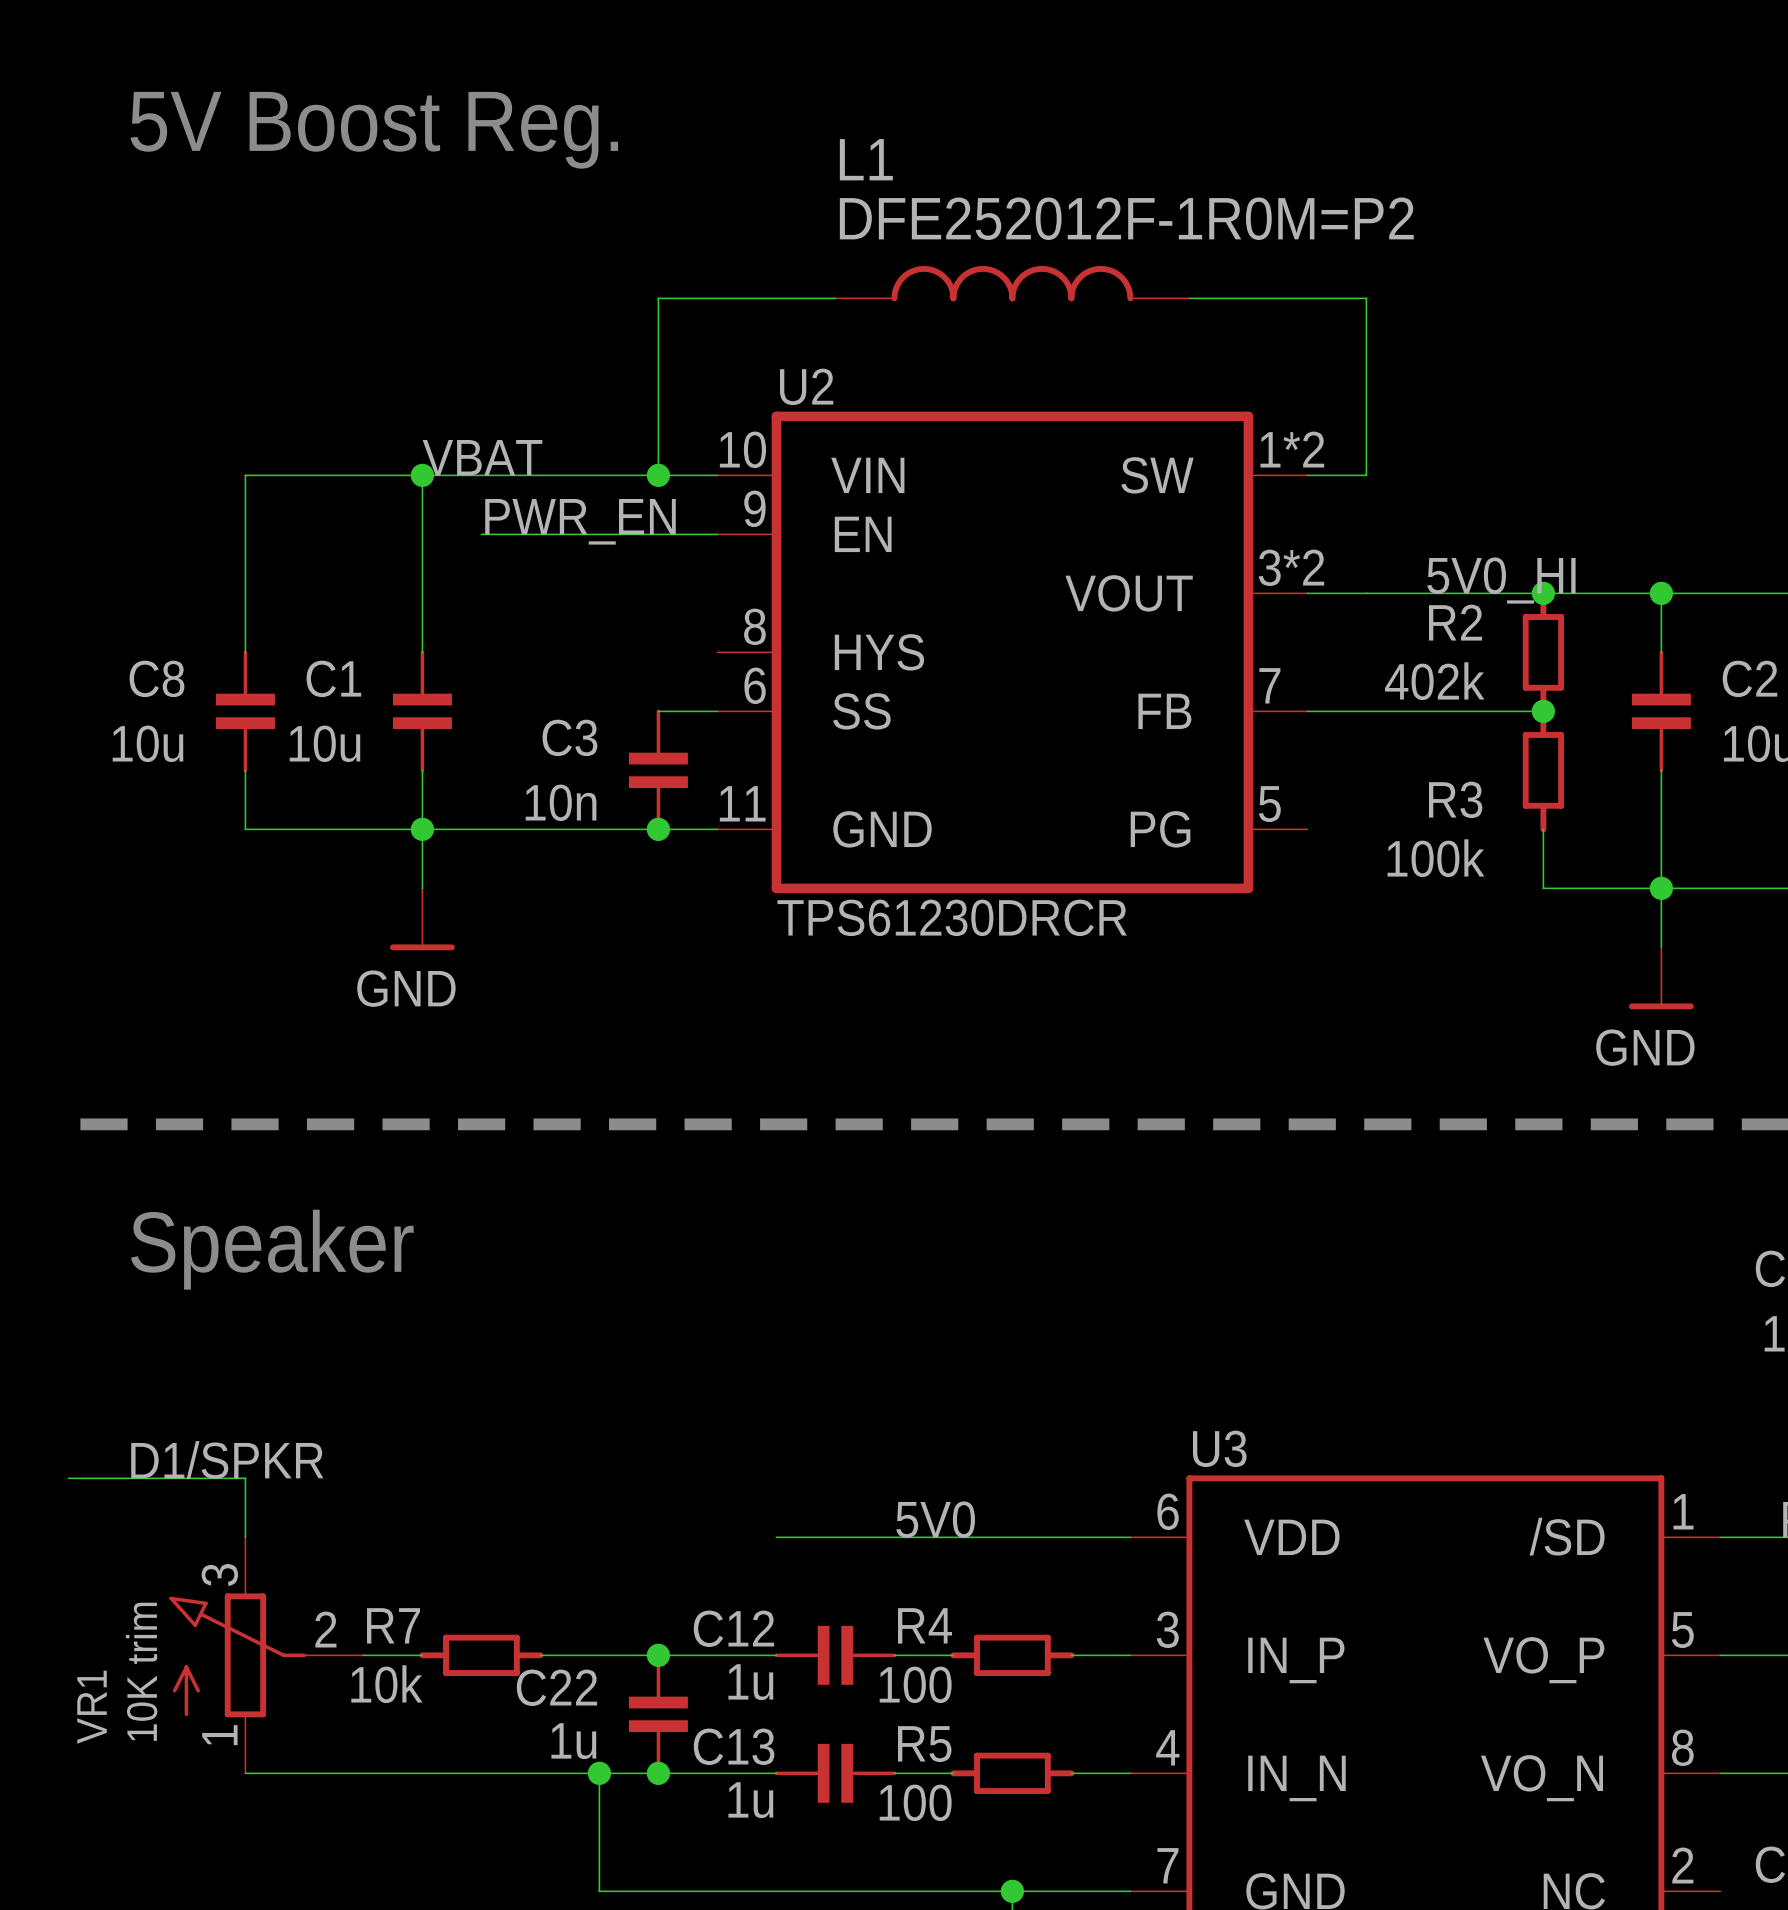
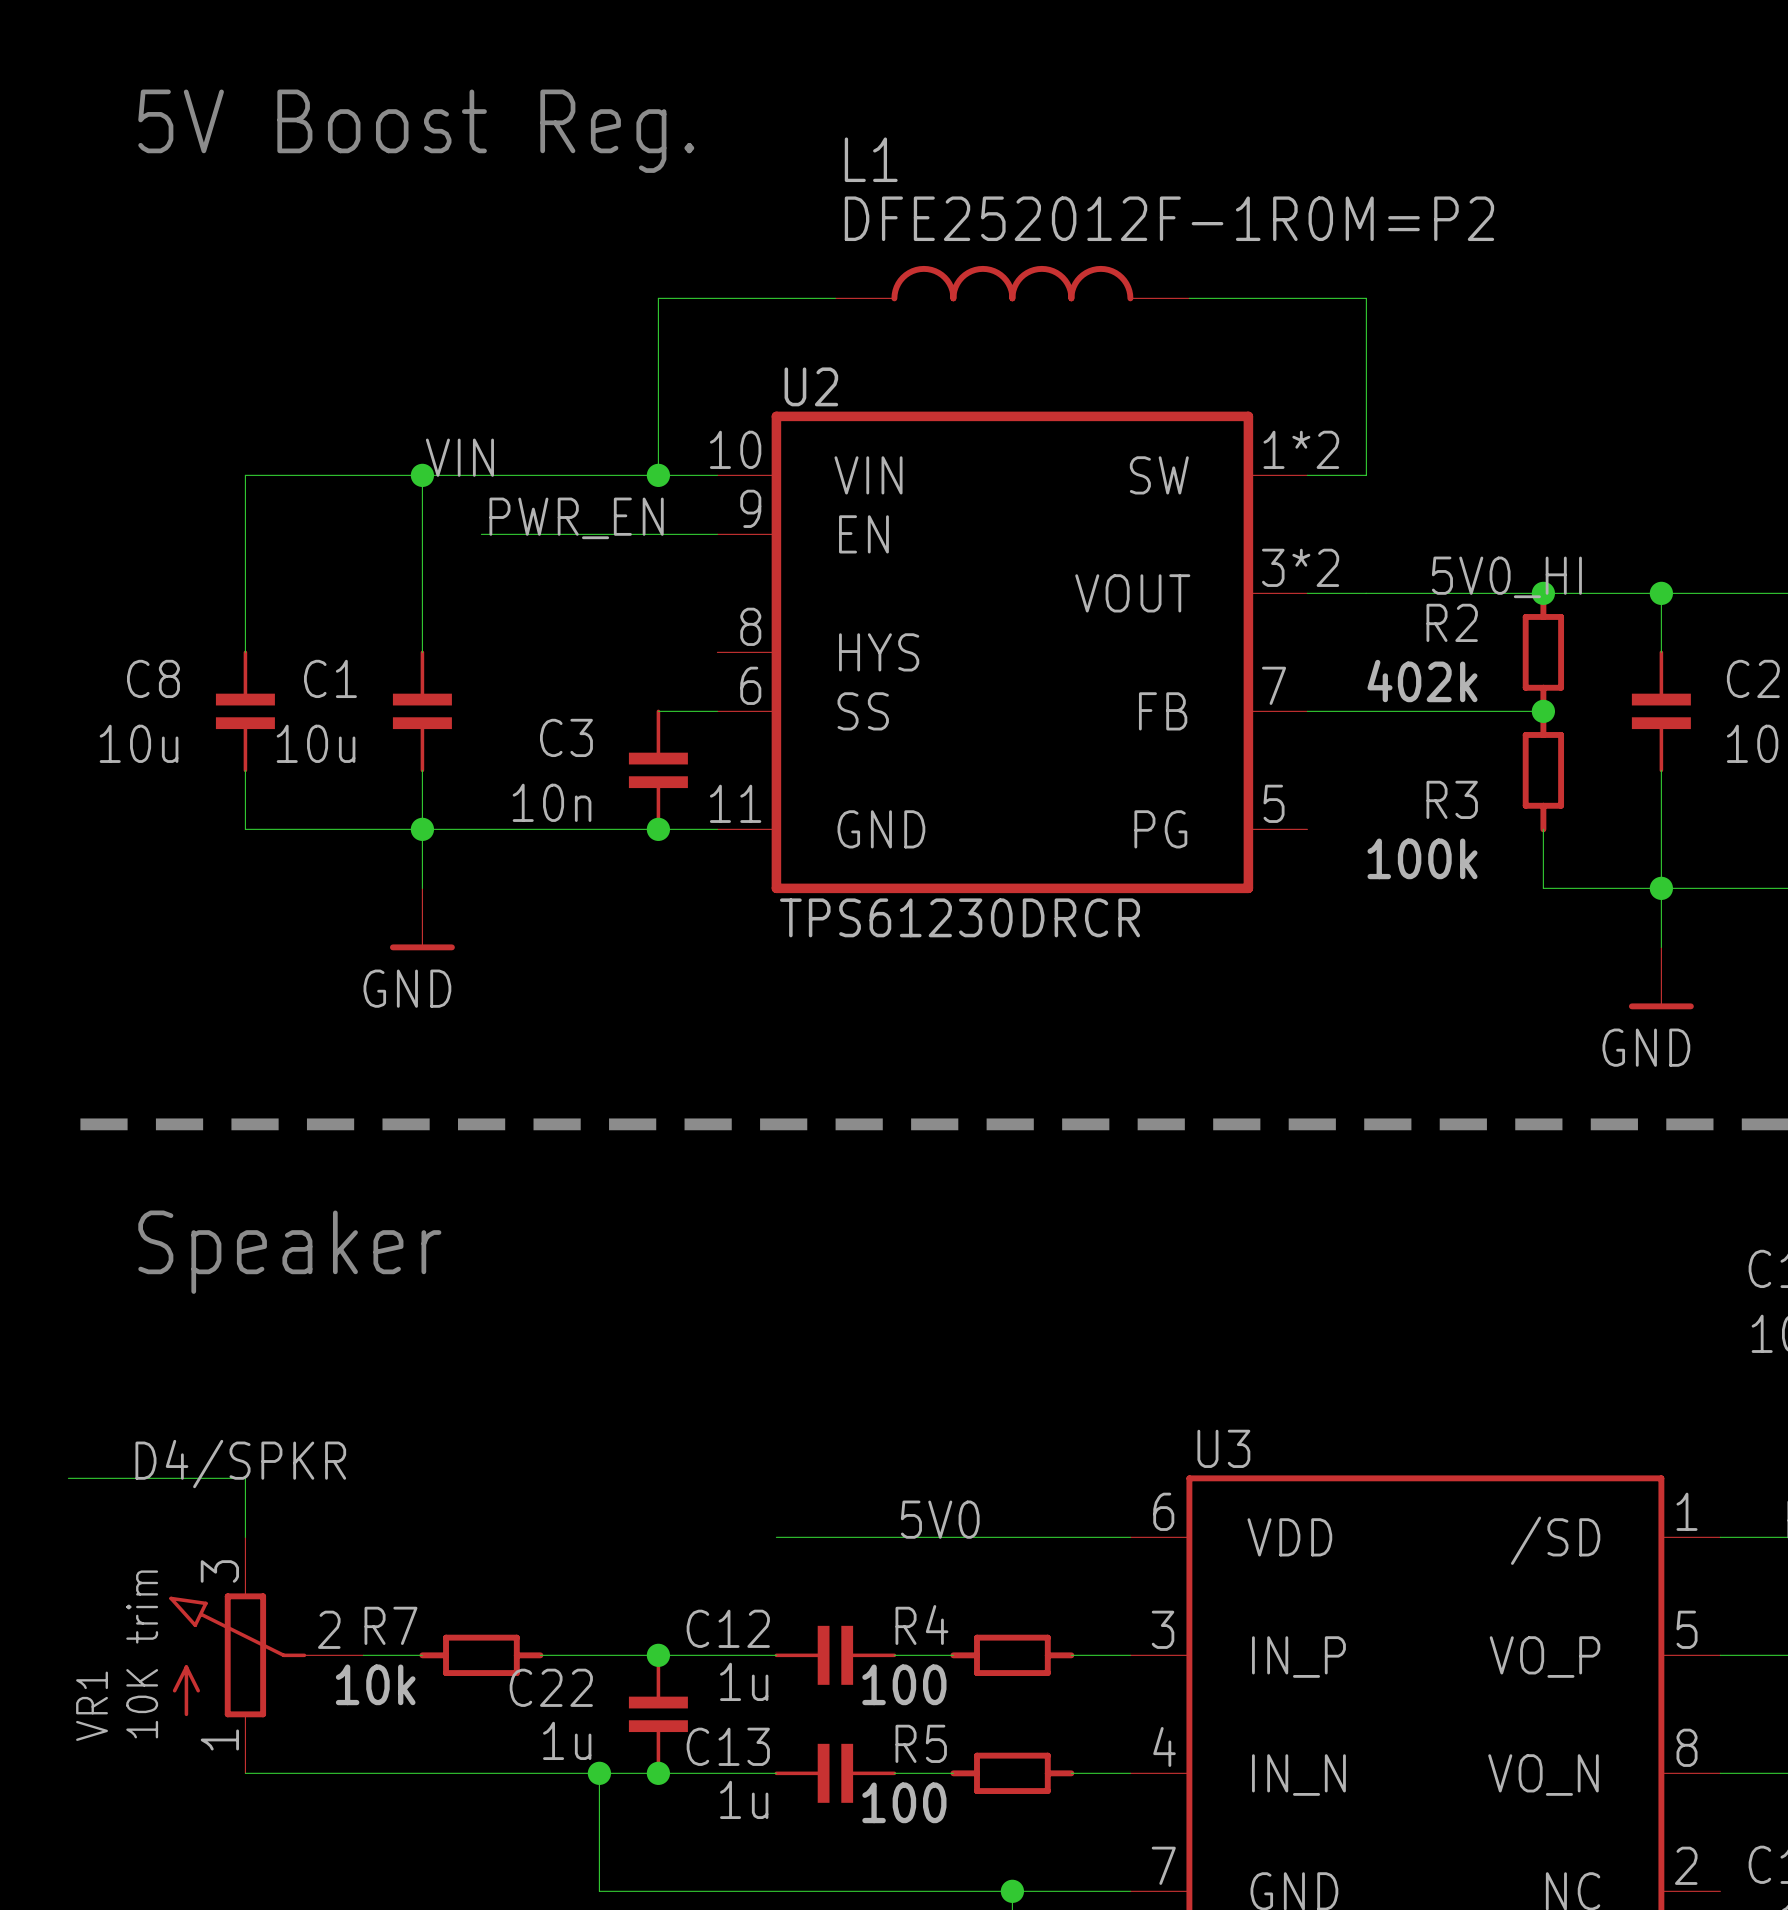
label: VBAT (482, 457) -> VIN (459, 457)
label: D1/SPKR (227, 1459) -> D4/SPKR (240, 1464)

